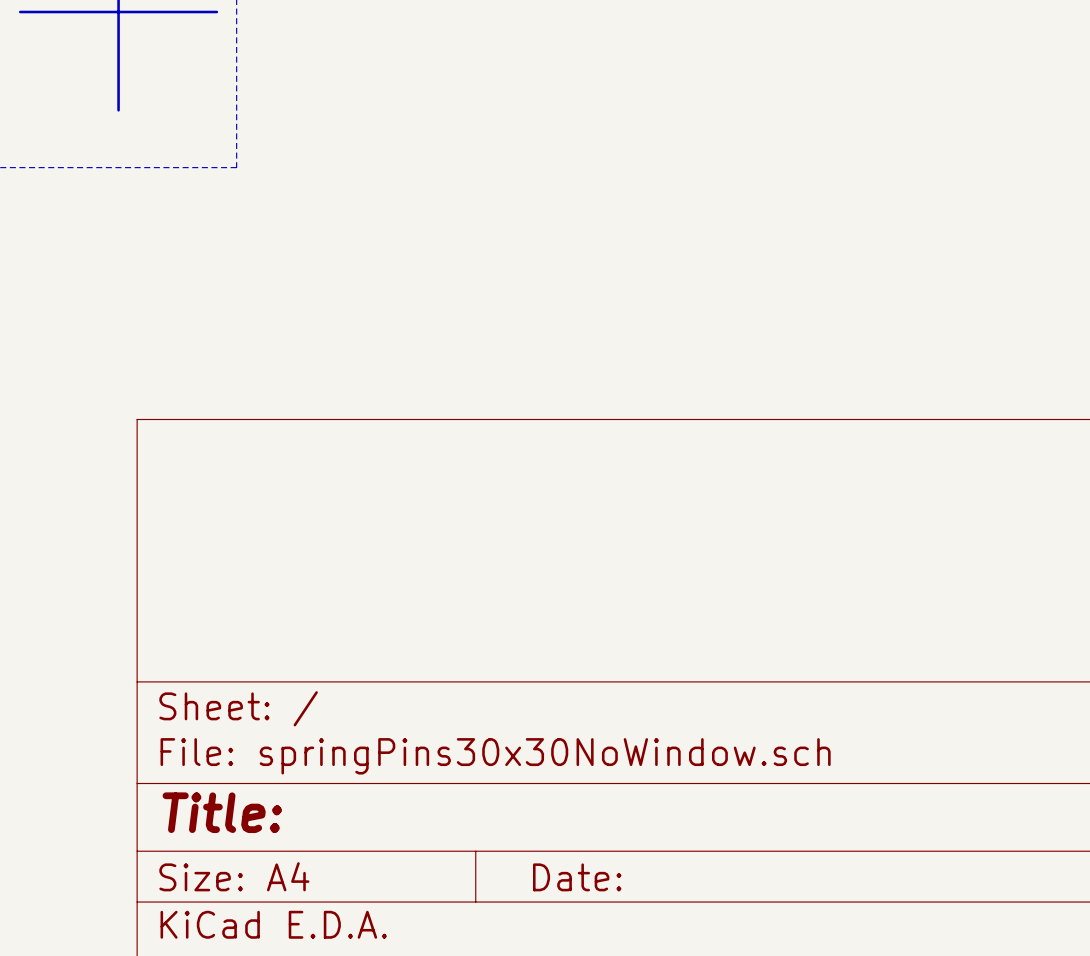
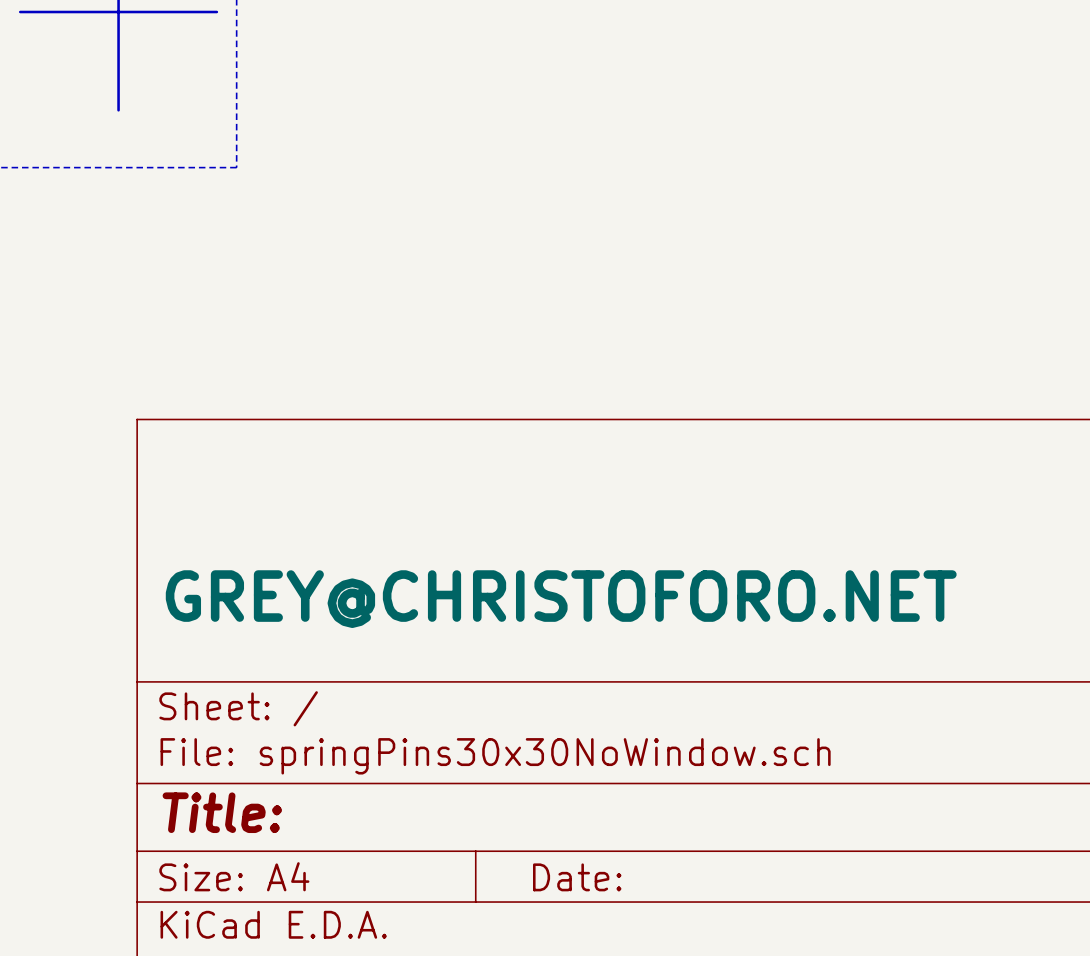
part: none -> GREY@CHRISTOFORO.NET (561, 599)

